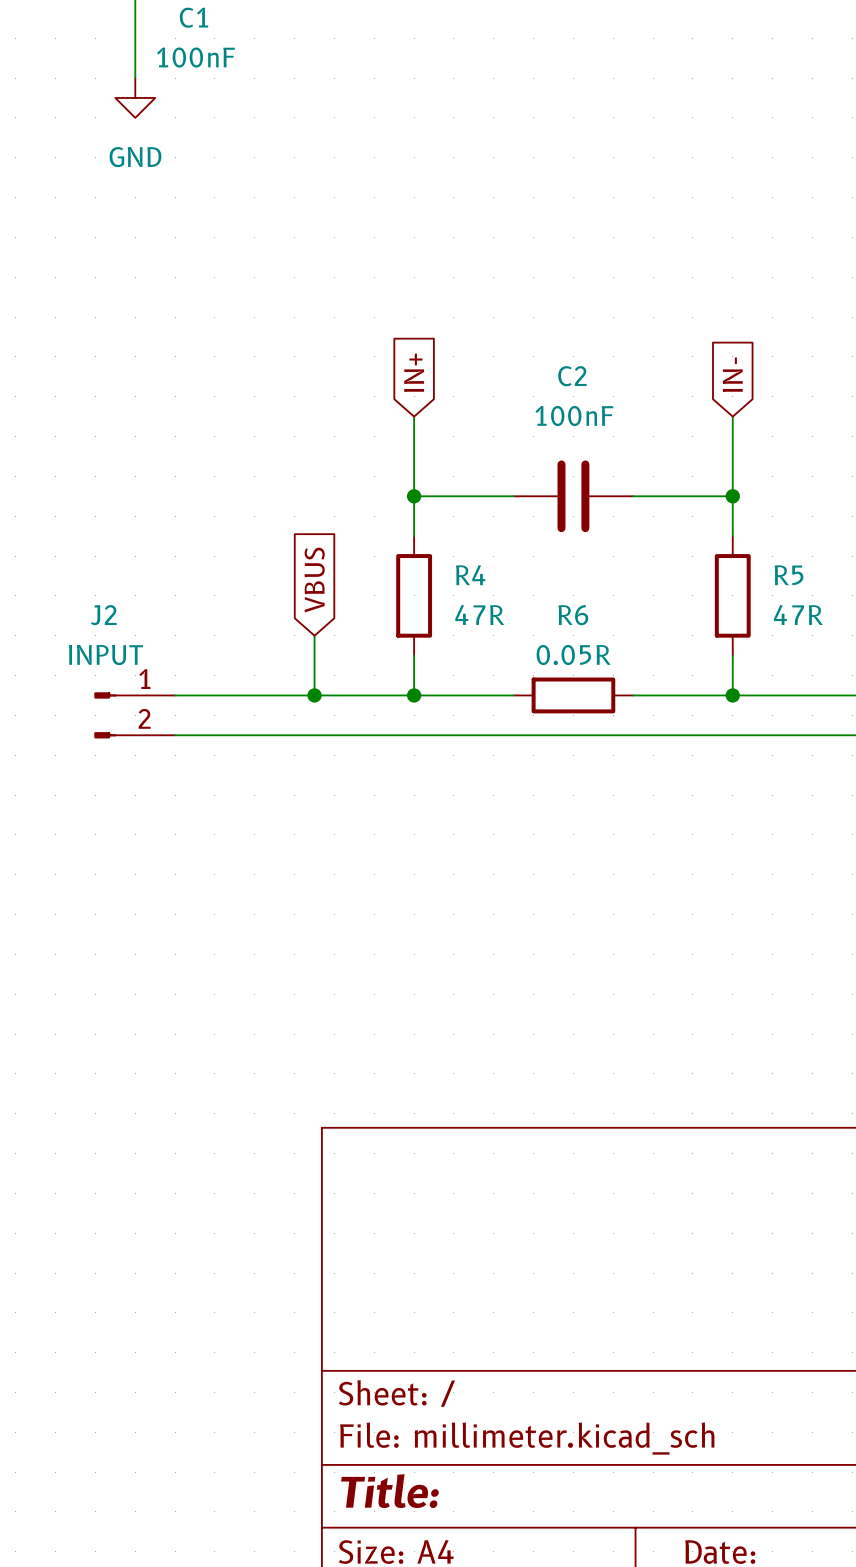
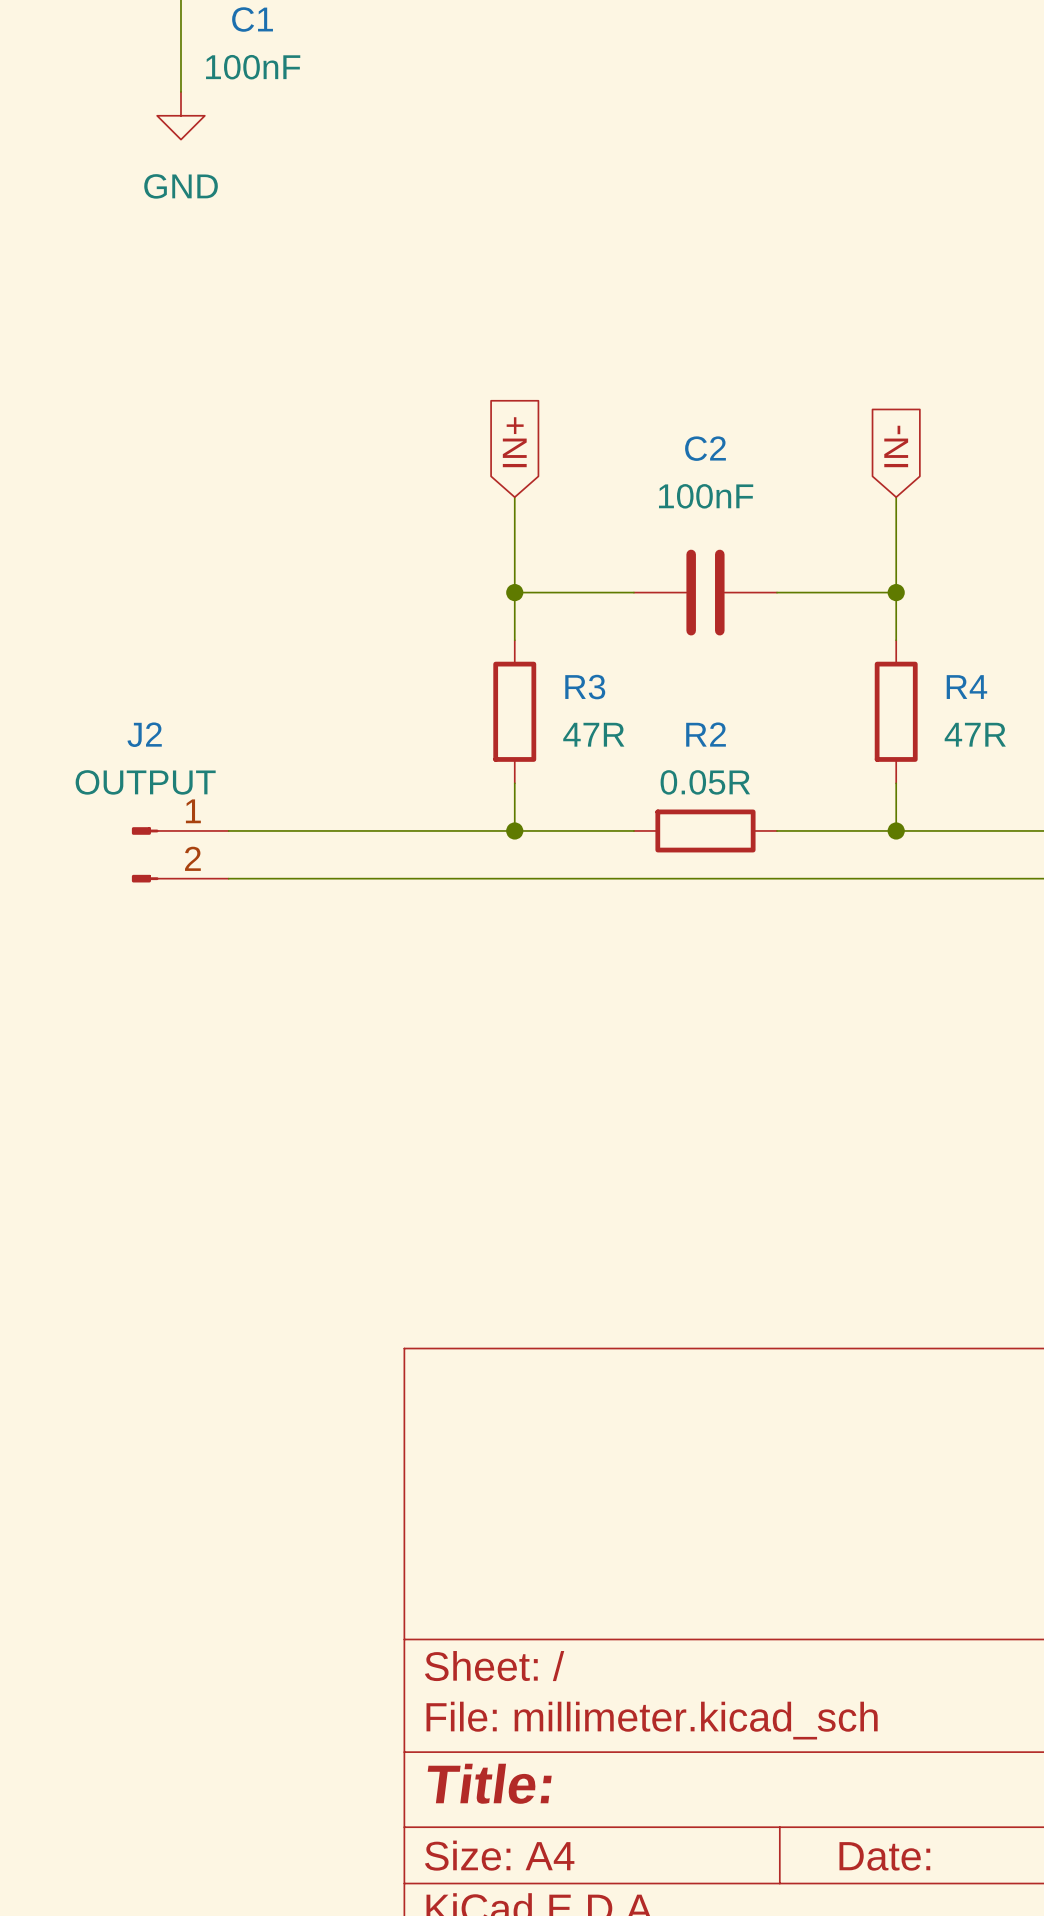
R4 name: R4 (470, 575) -> R3 (585, 687)
R5 name: R5 (789, 575) -> R4 (966, 687)
global label: VBUS (314, 580) -> none
R6 name: R6 (573, 615) -> R2 (706, 734)
wire: (314, 635) (314, 695) -> none
J2 value: INPUT (105, 654) -> OUTPUT (145, 782)
junction: (314, 695) -> none

